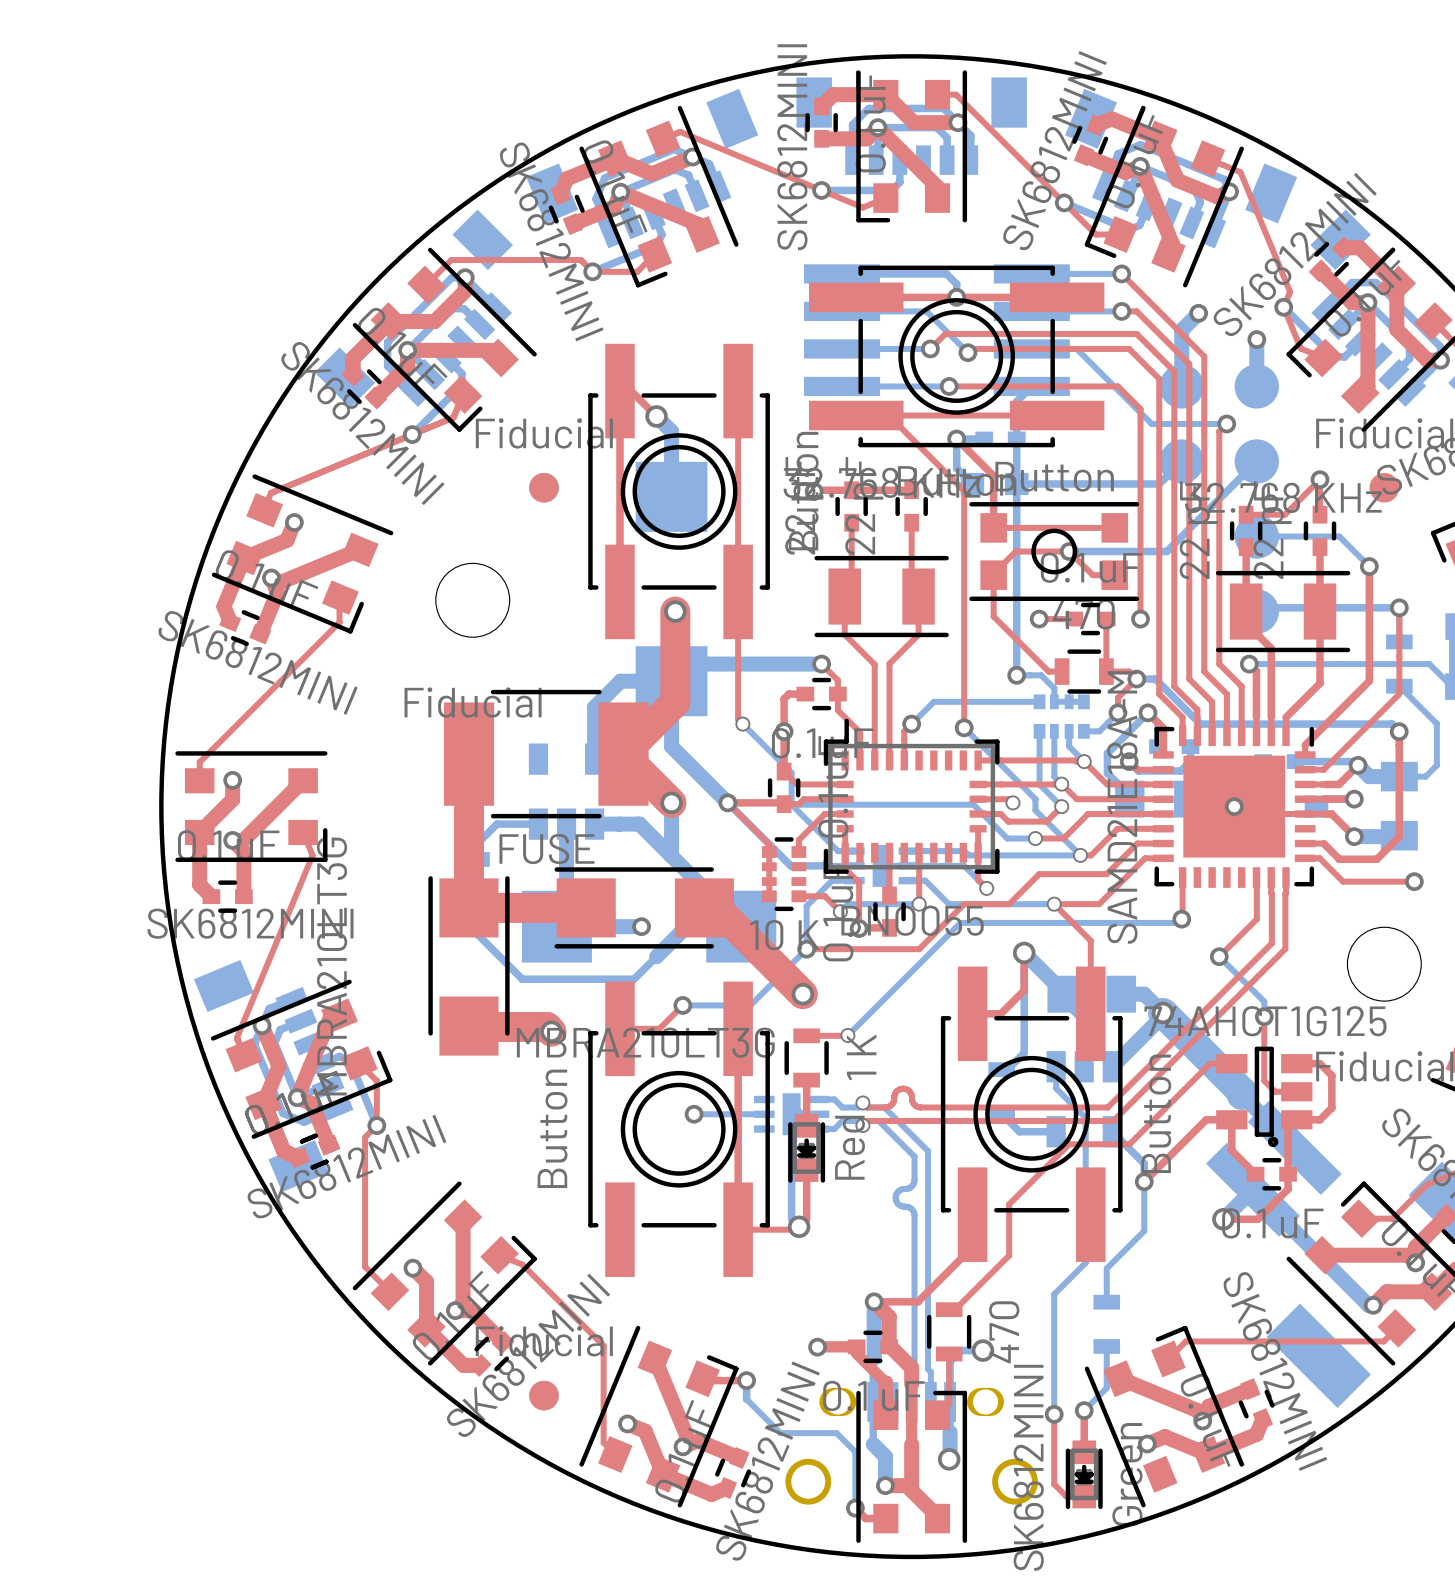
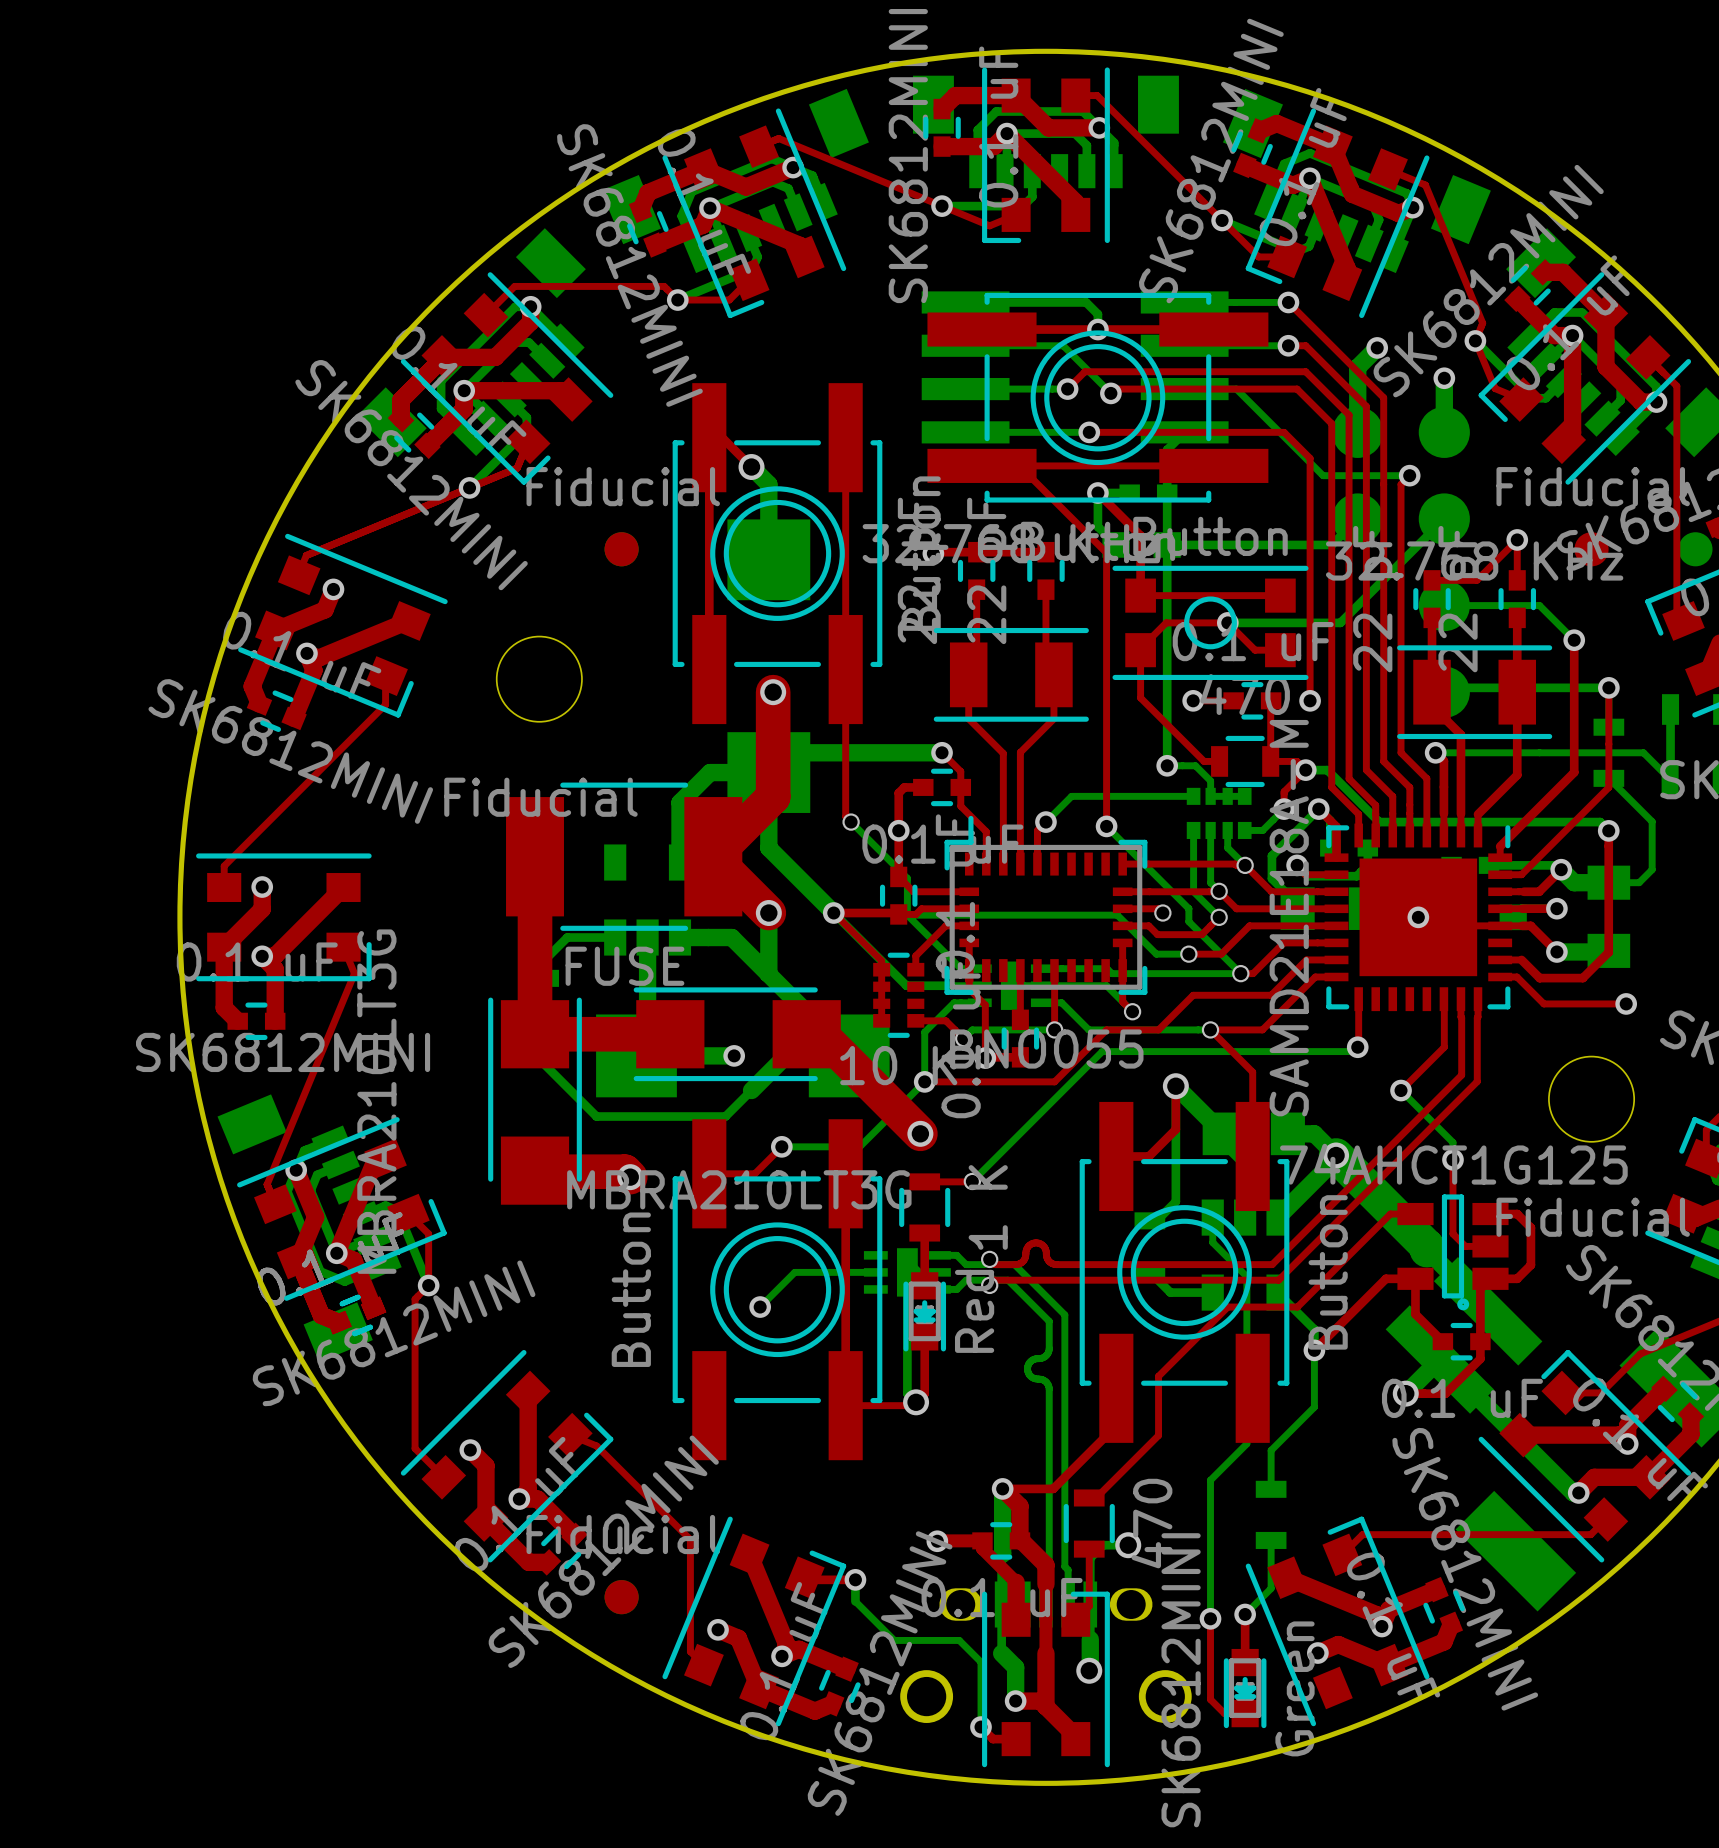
bottom track: none -> (794, 1272) (760, 1307)
via position: (694, 1114) -> (760, 1307)

